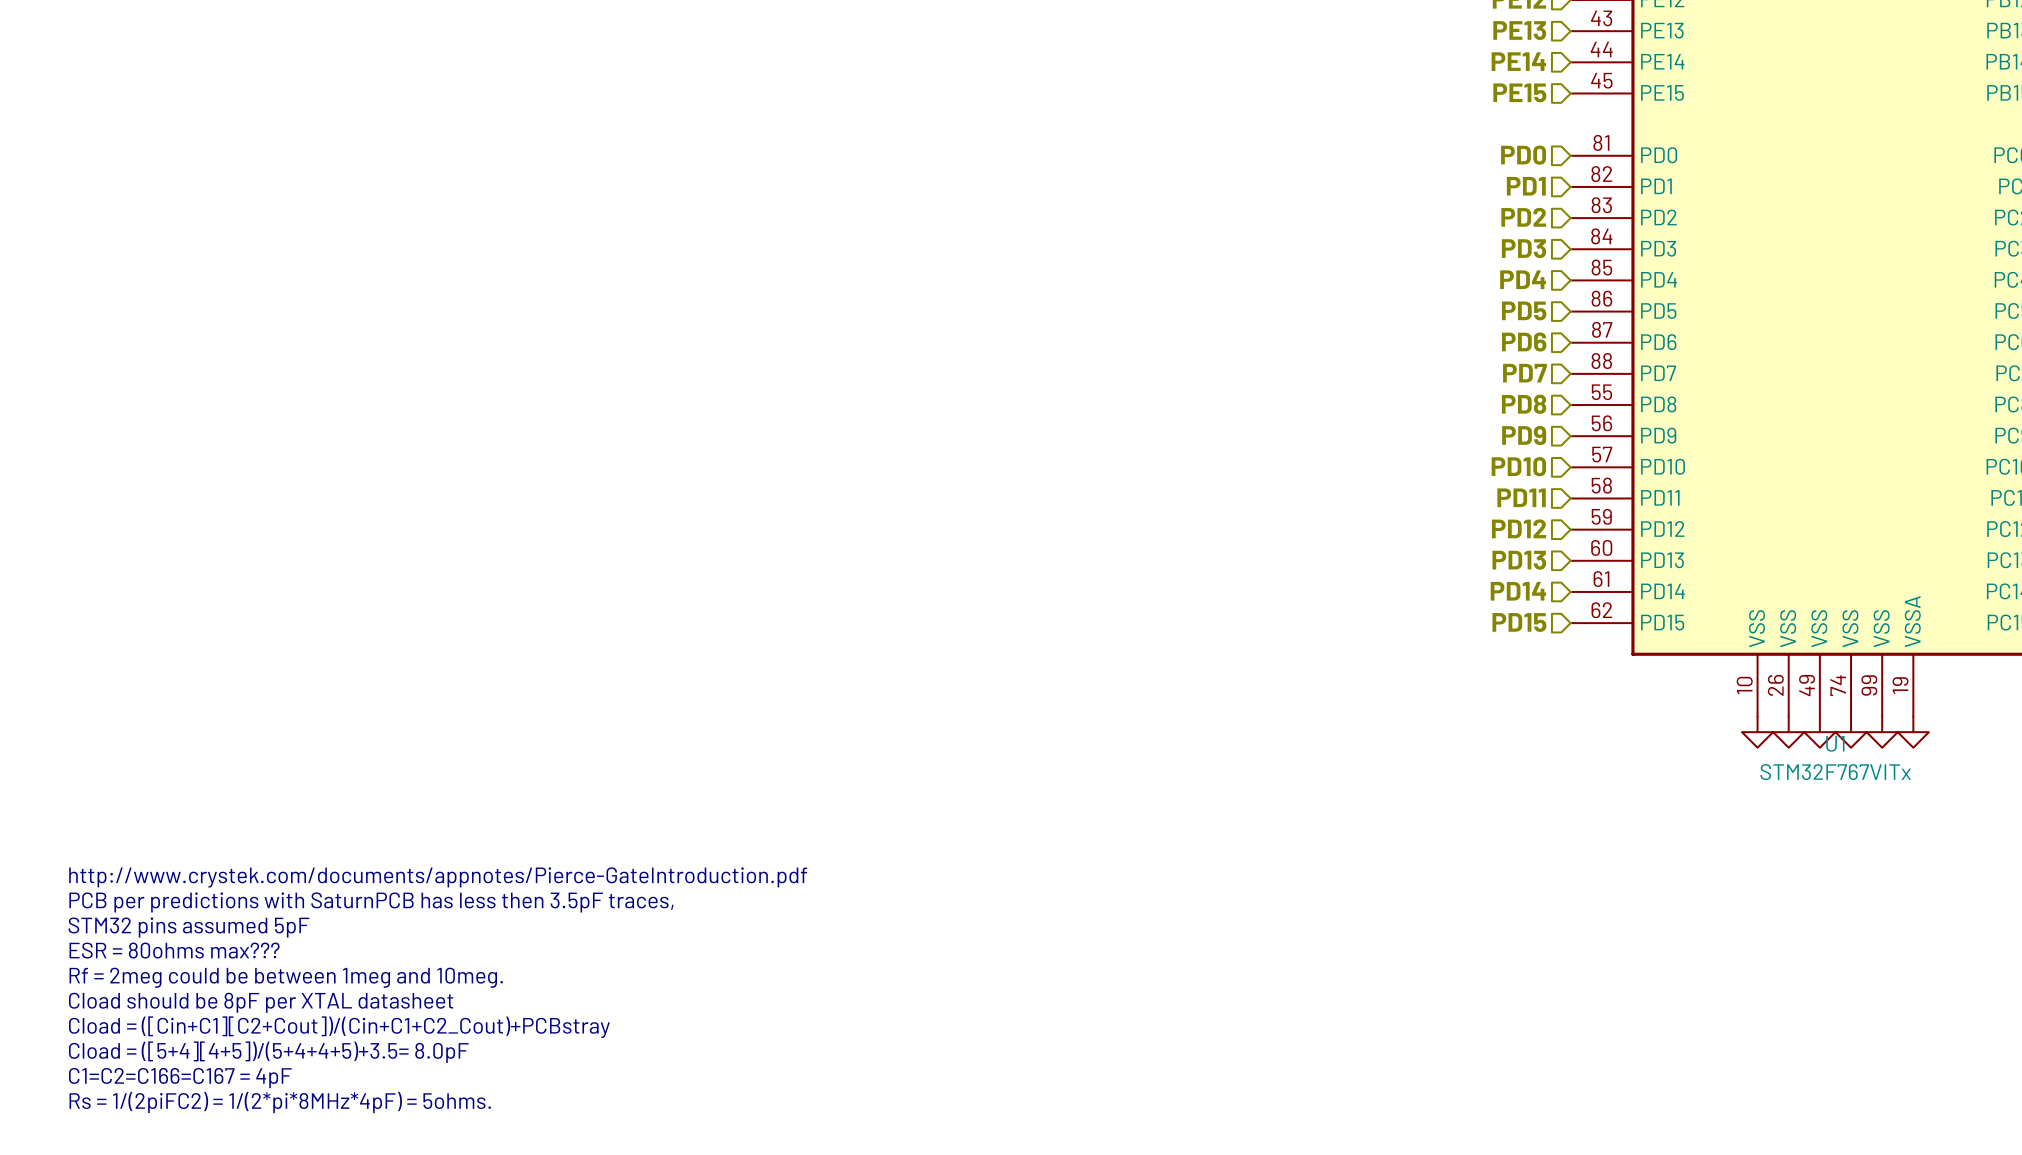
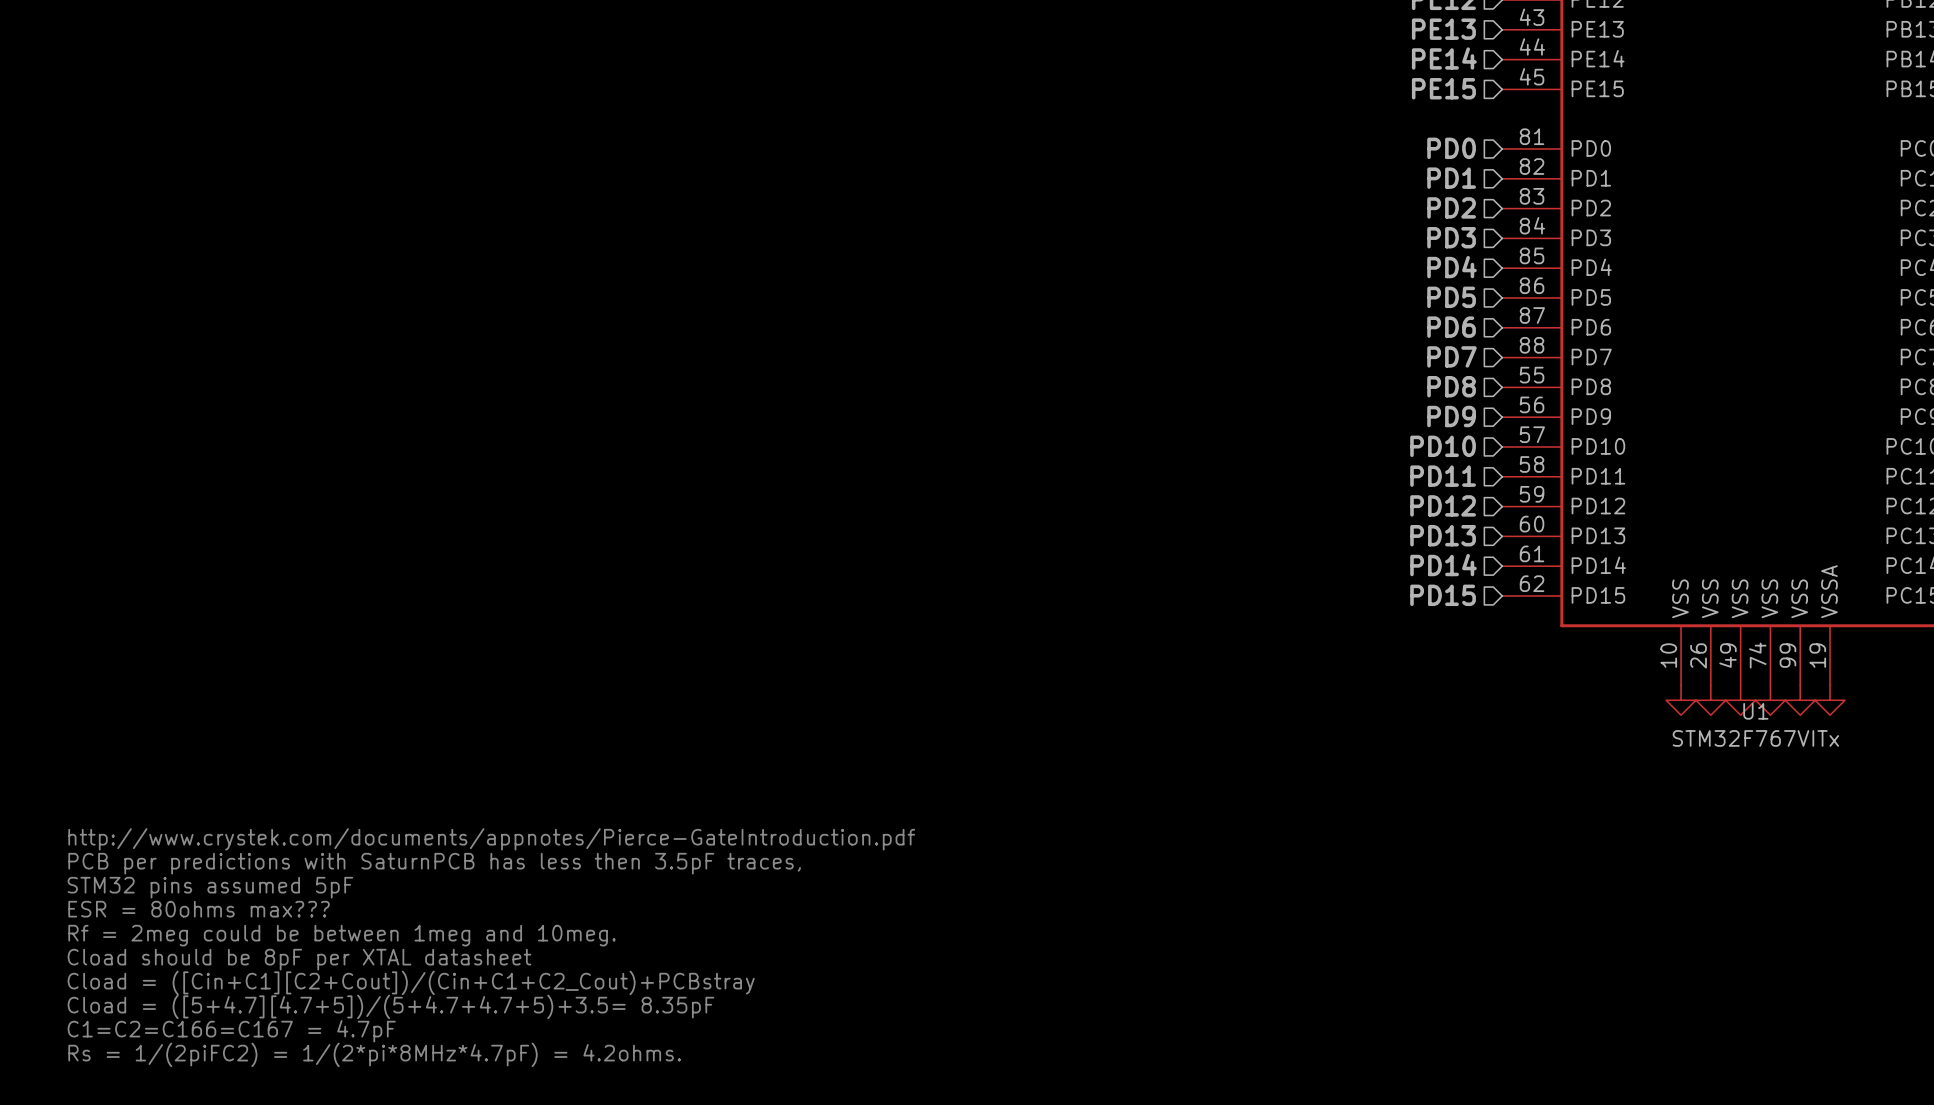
text: Cload = ([5+4][4+5])/(5+4+4+5)+3.5= 8.0pF (268, 1052) -> Cload = ([5+4.7][4.7+5])/(5+4.7+4.7+5)+3.5= 8.35pF (390, 1006)
text: C1=C2=C166=C167 = 4pF (180, 1078) -> C1=C2=C166=C167 = 4.7pF (231, 1031)
text: Rs = 1/(2piFC2) = 1/(2*pi*8MHz*4pF) = 5ohms. (280, 1102) -> Rs = 1/(2piFC2) = 1/(2*pi*8MHz*4.7pF) = 4.2ohms. (374, 1054)

